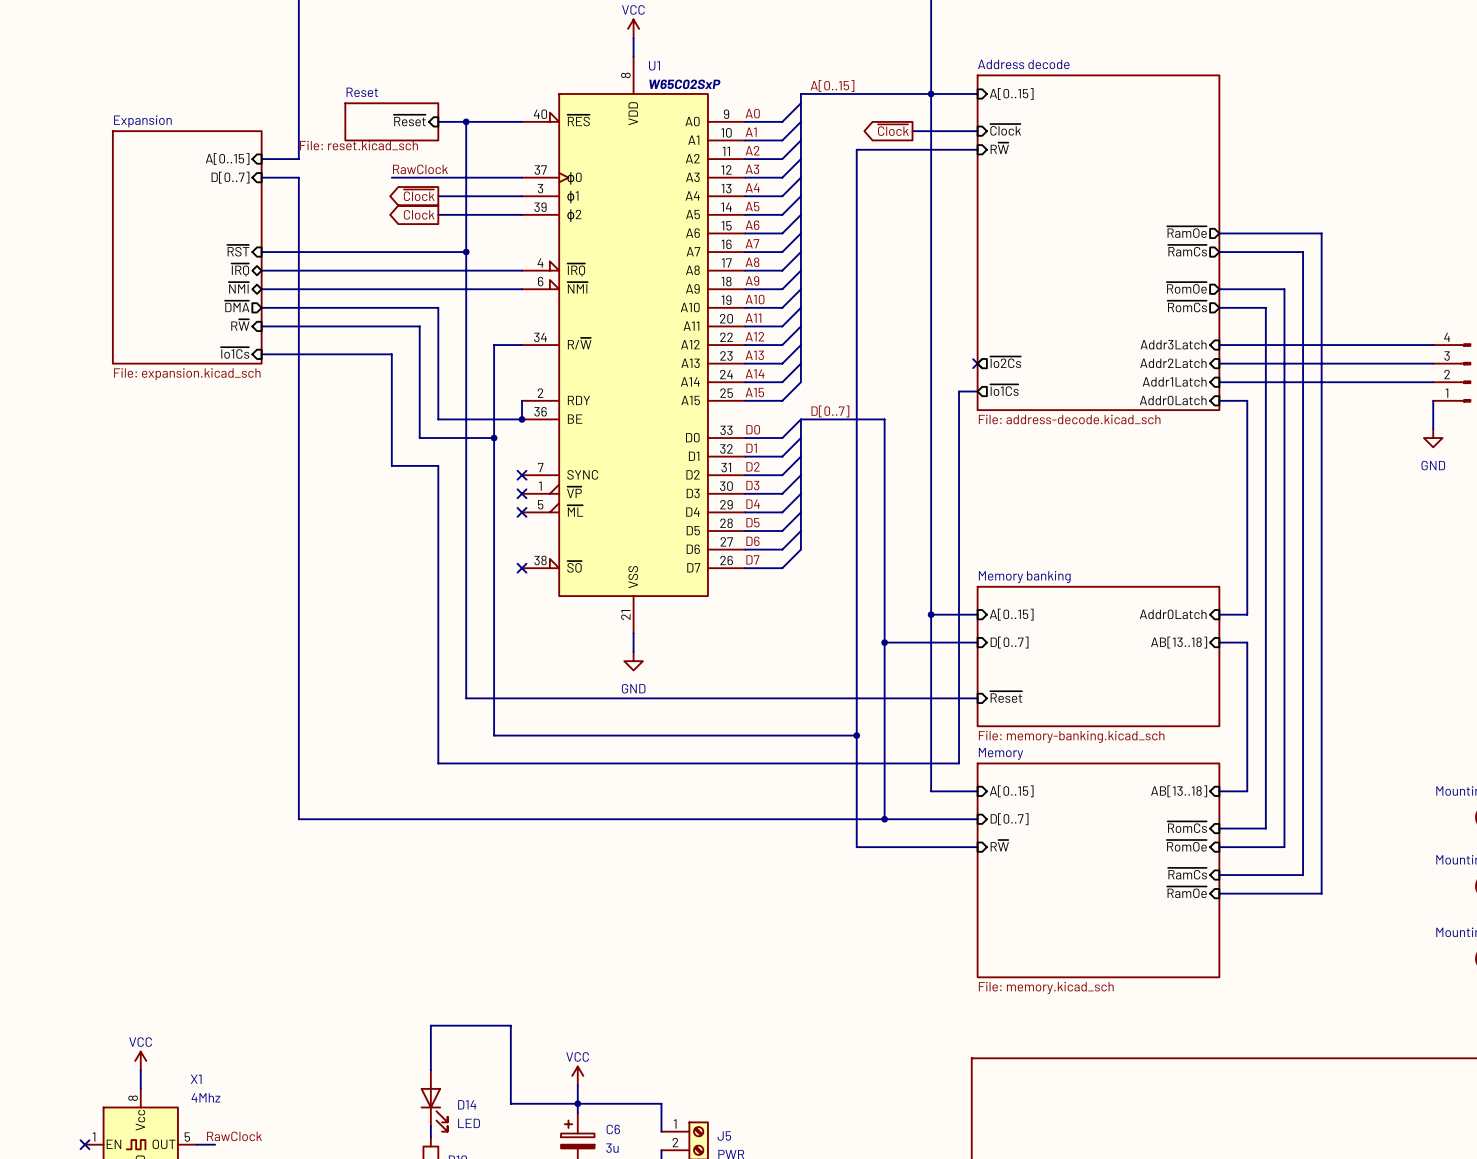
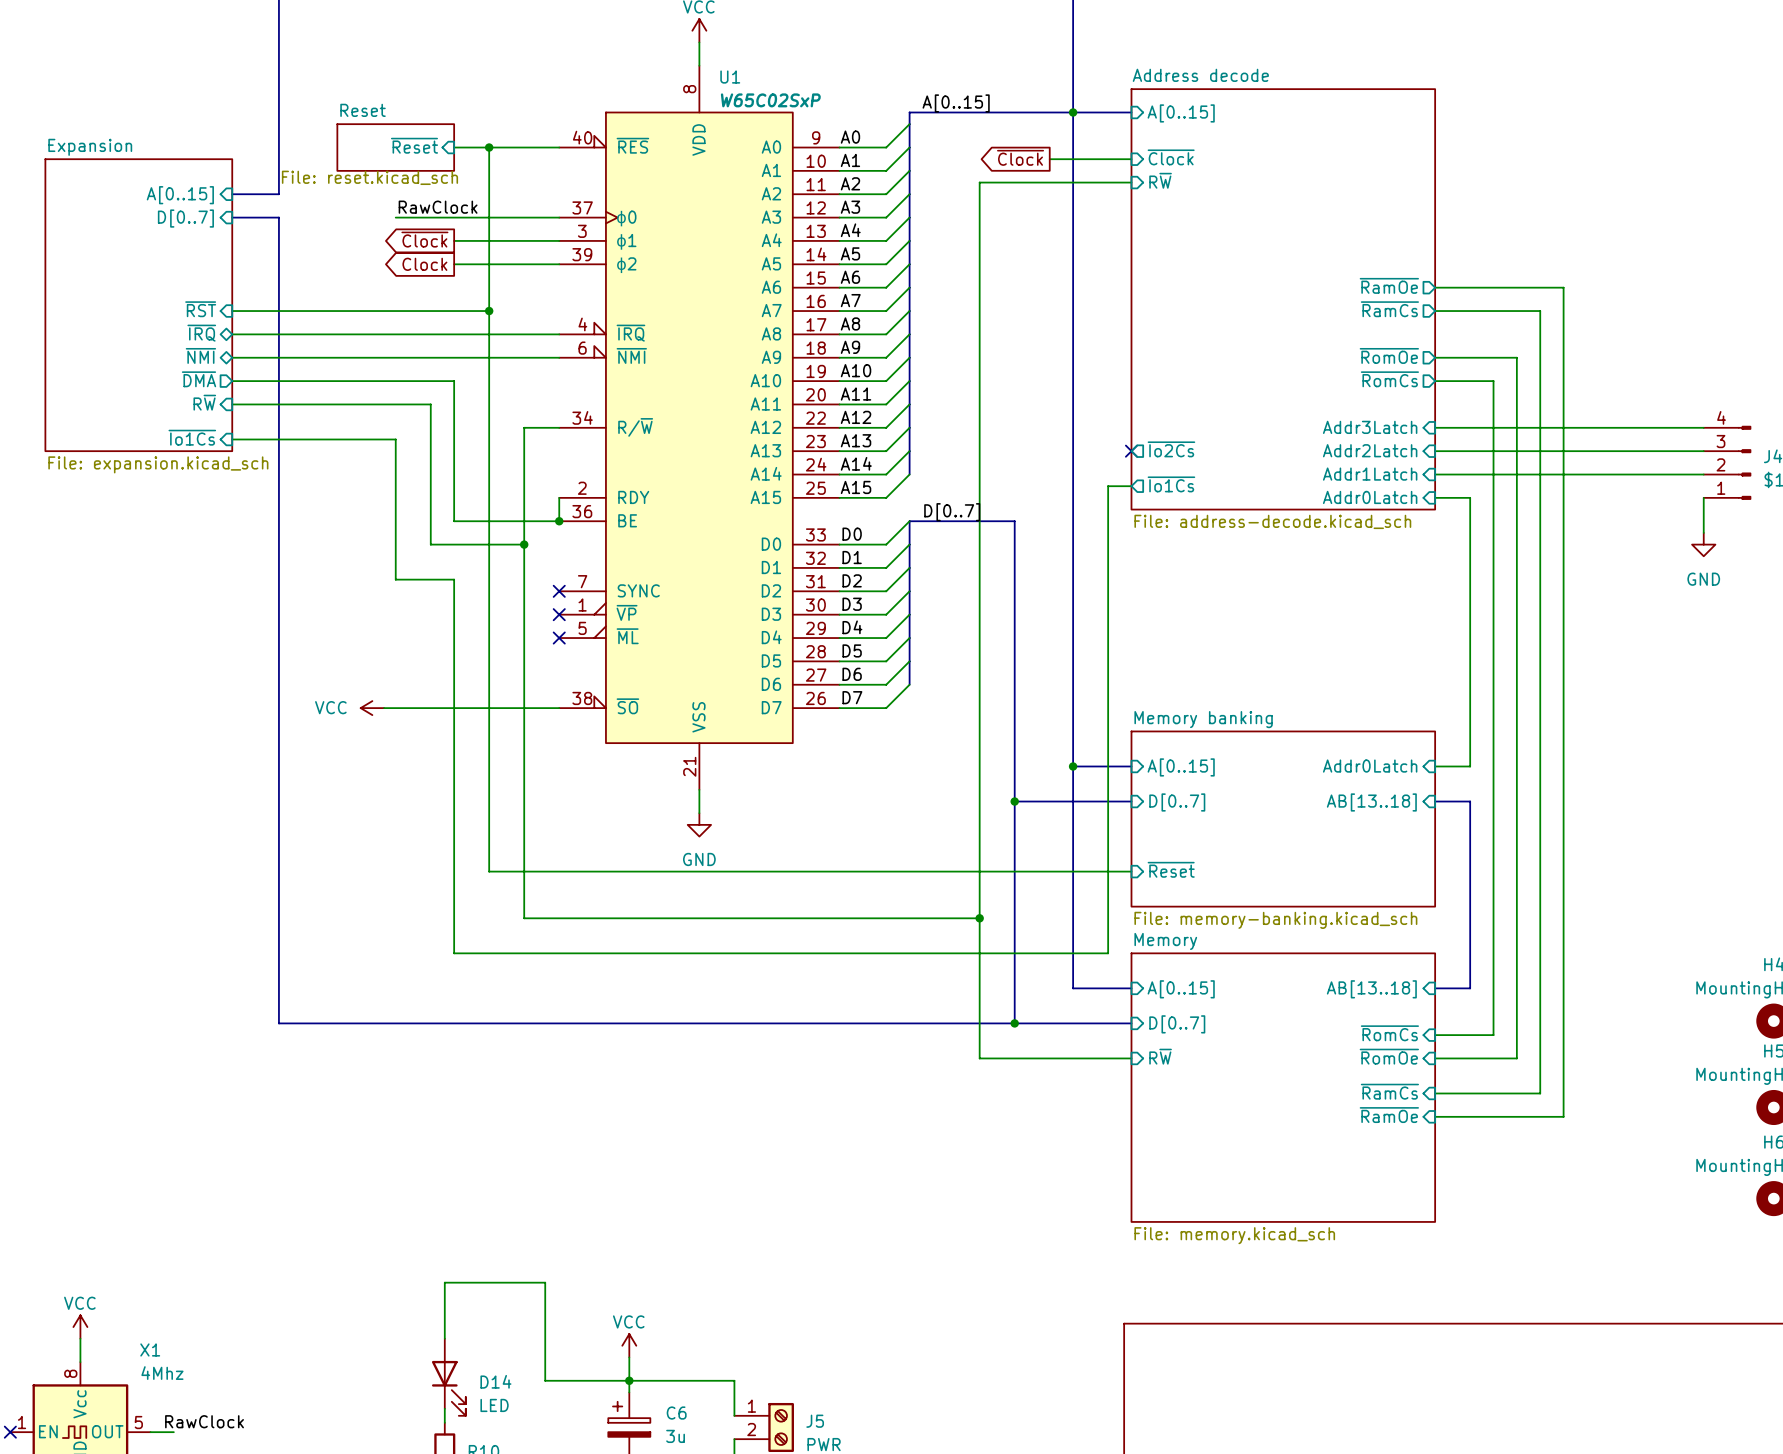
power symbol: none -> VCC (372, 708)
wire: none -> (384, 708) (559, 708)
no-connect mark: (521, 568) -> none

